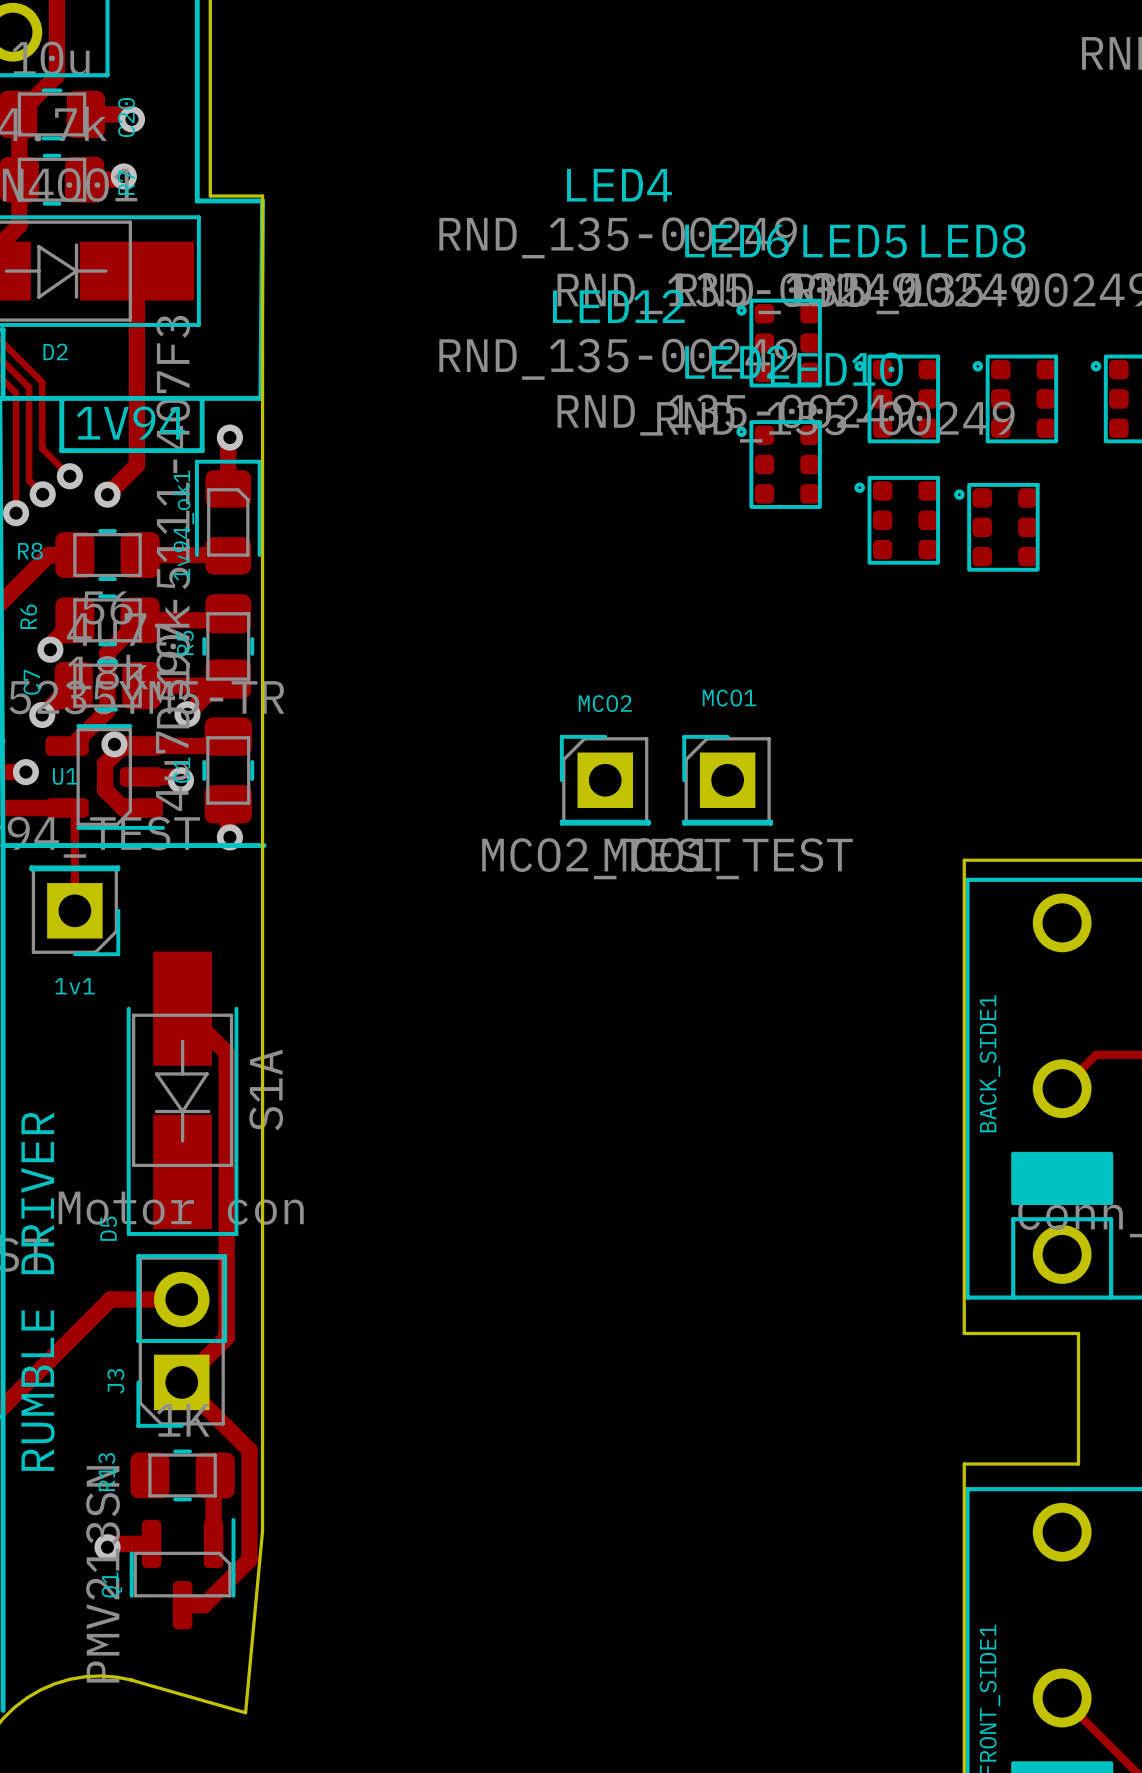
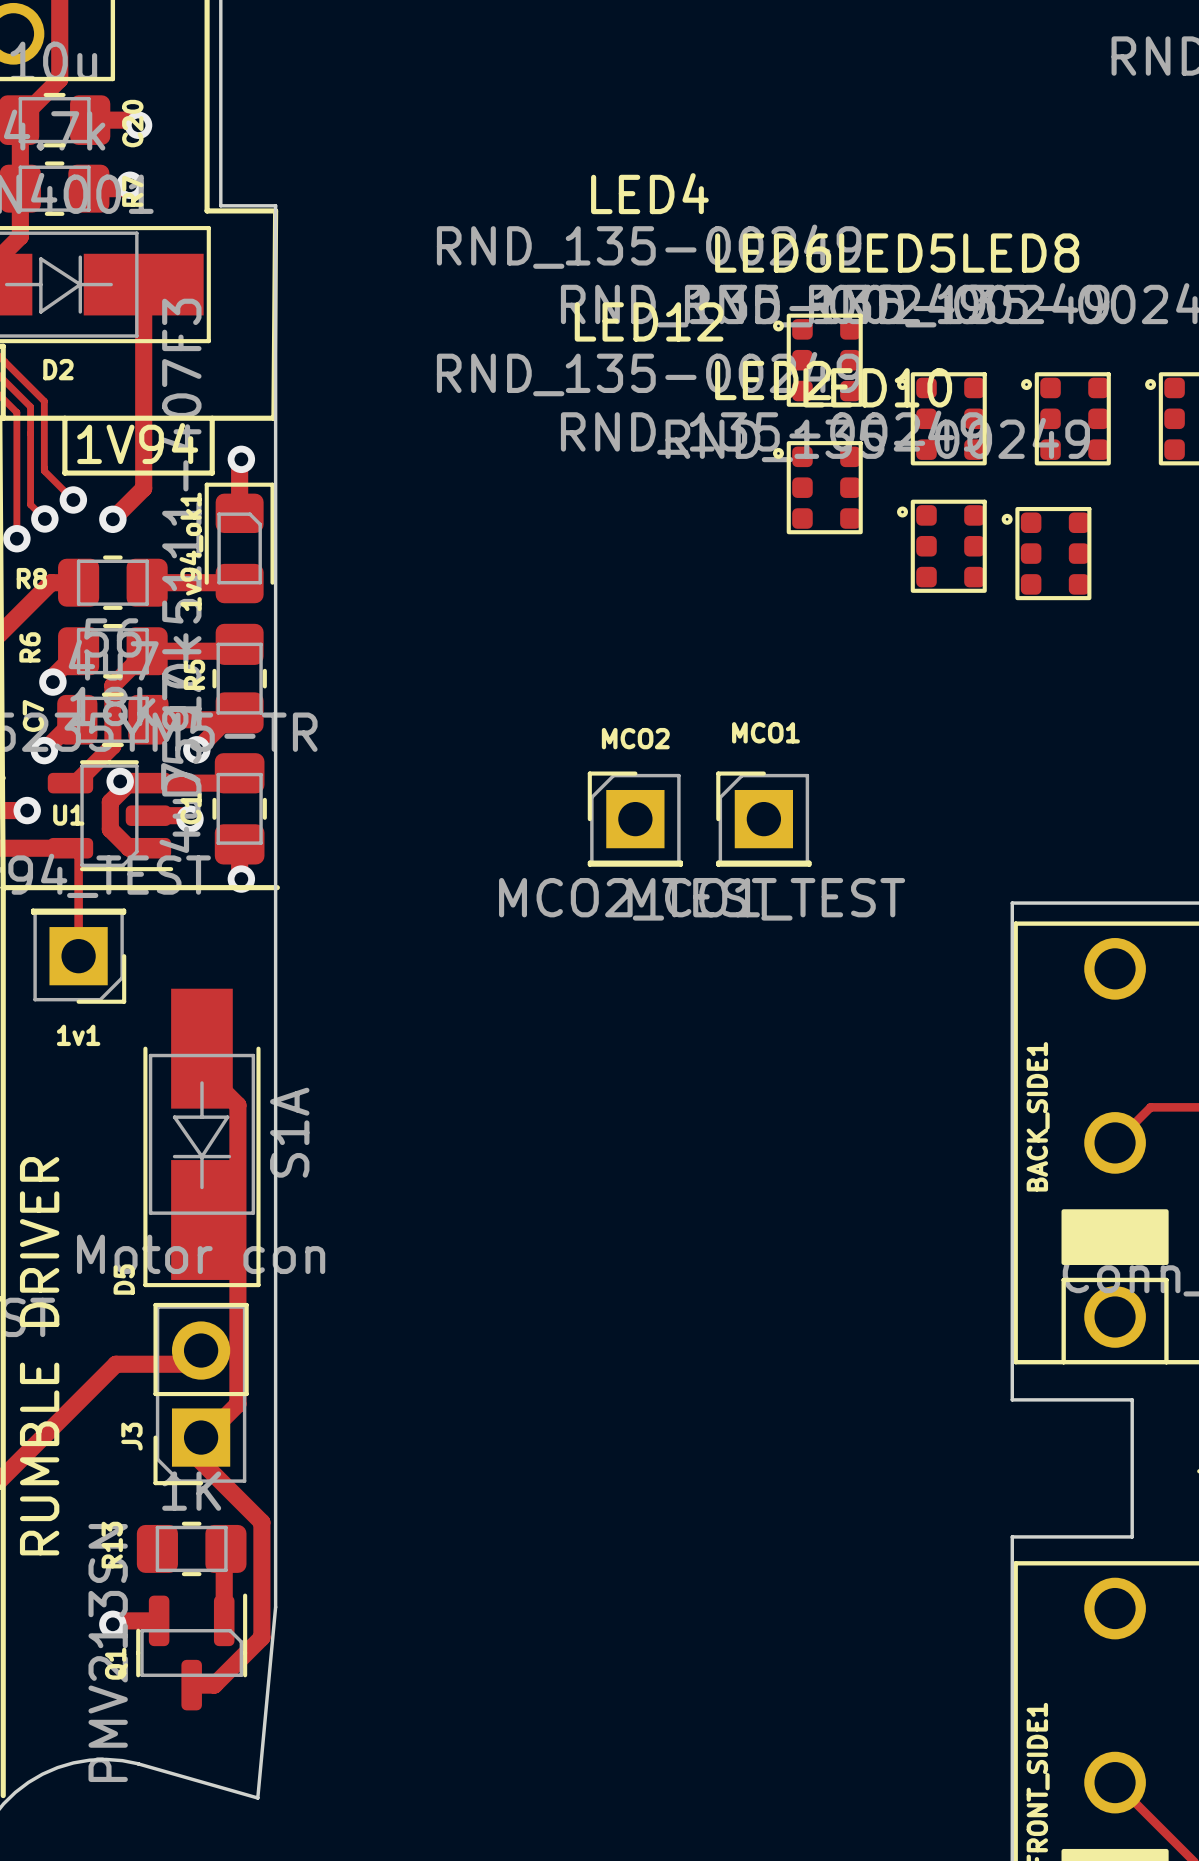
D5 position: (182, 1093) -> (201, 1137)
J3 position: (181, 1340) -> (201, 1394)

